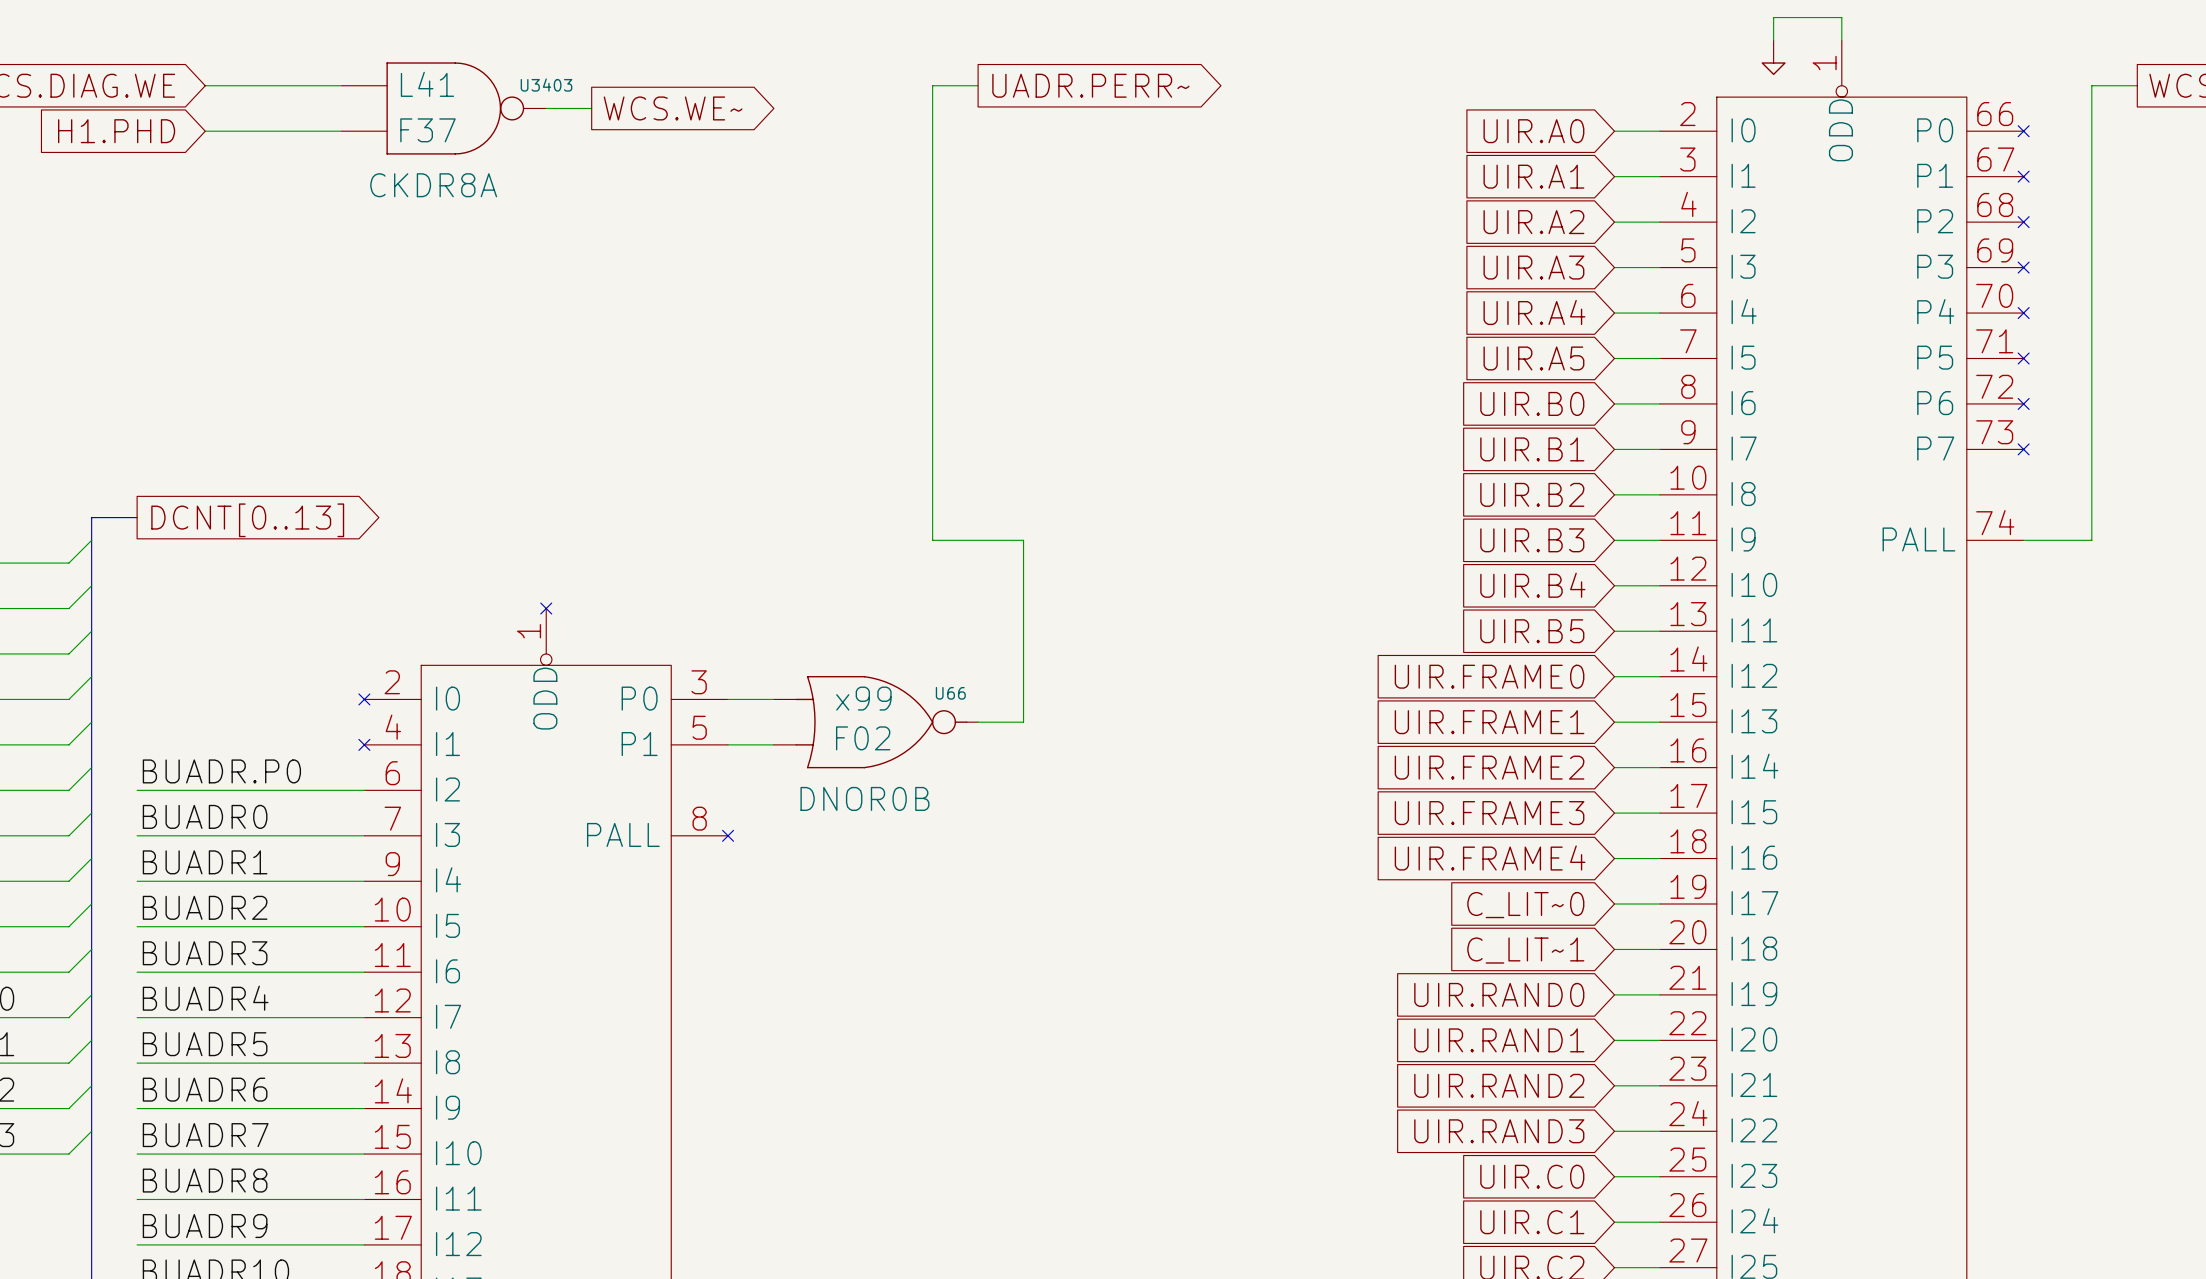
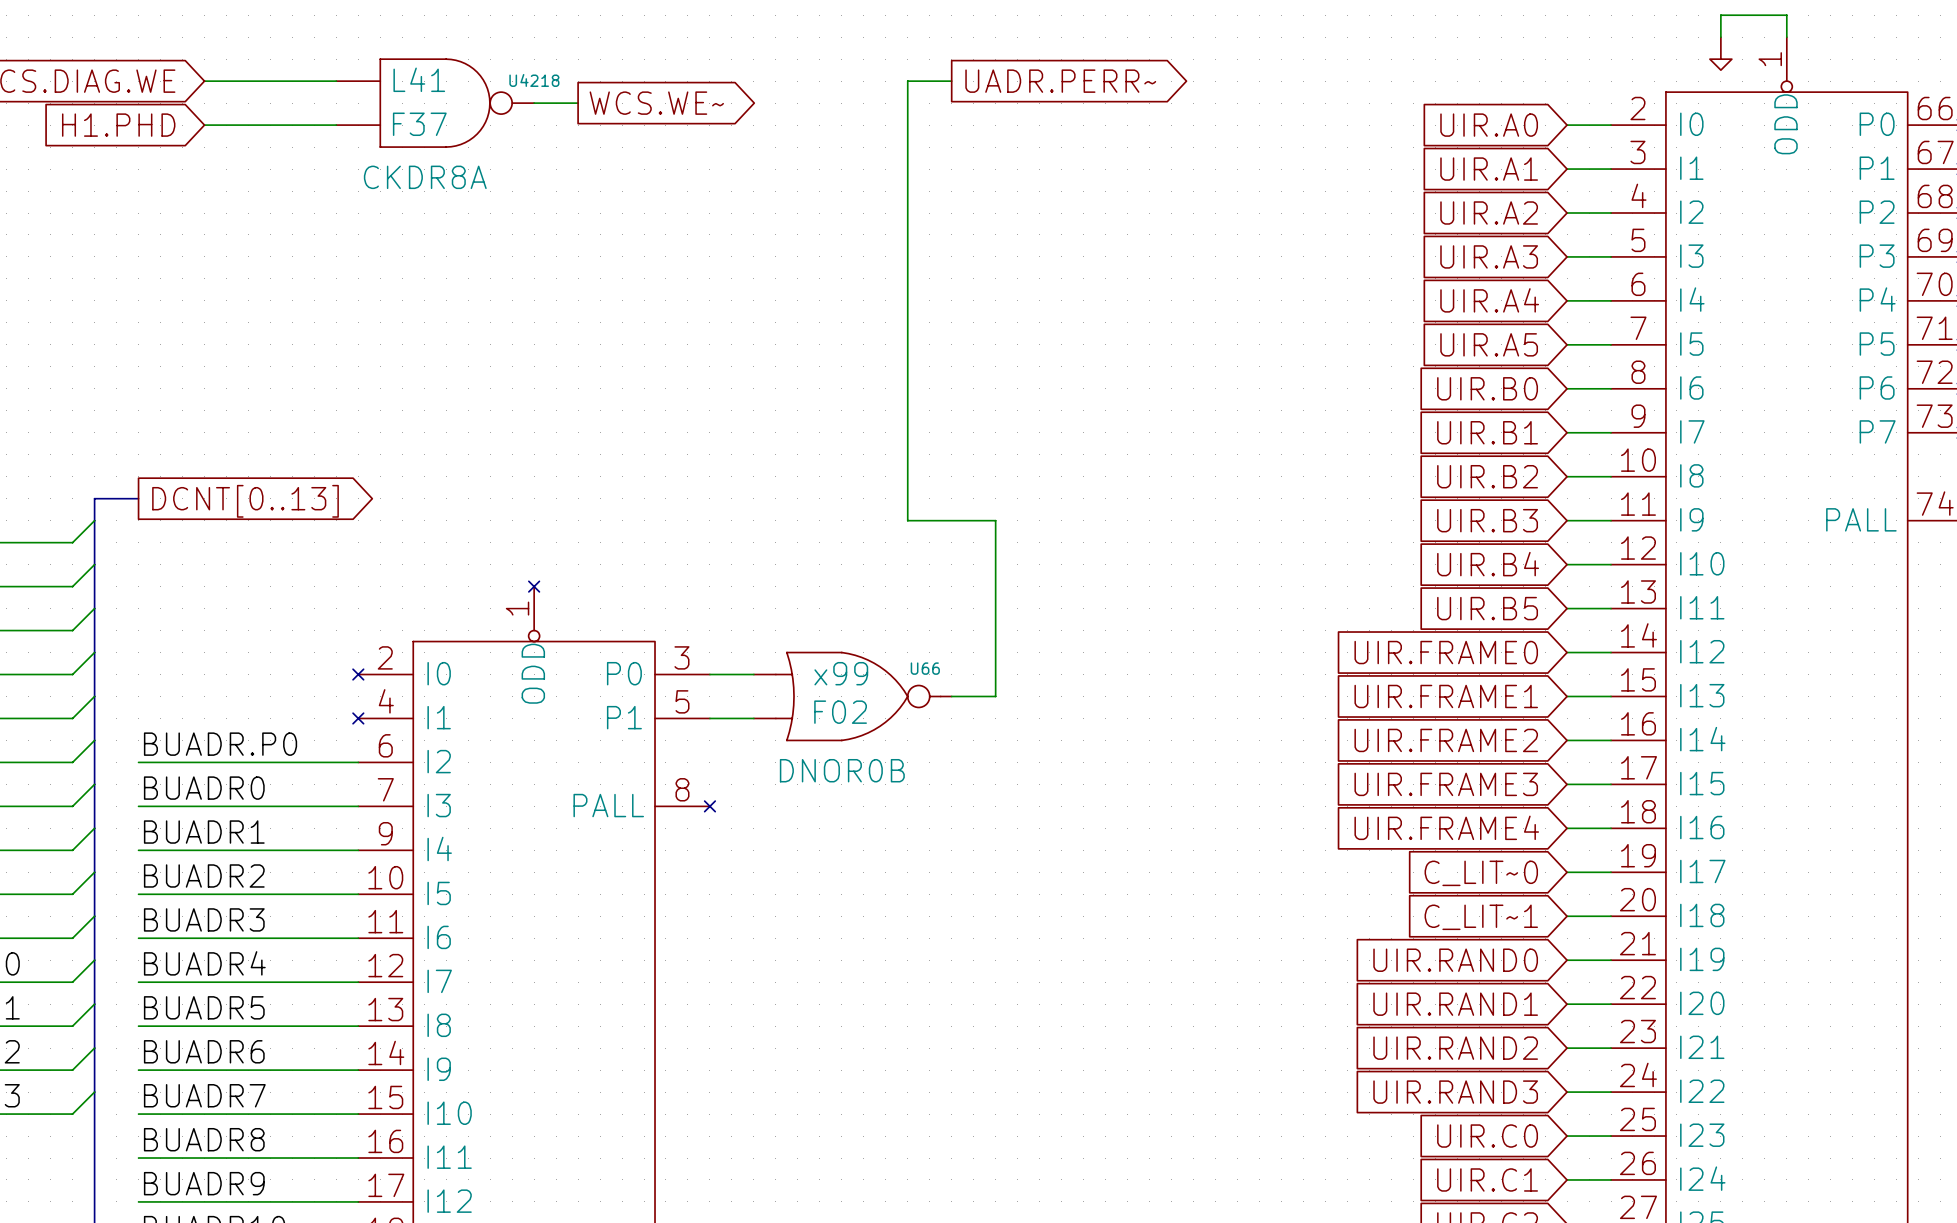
U3403 name: U3403 (546, 85) -> U4218 (534, 80)

